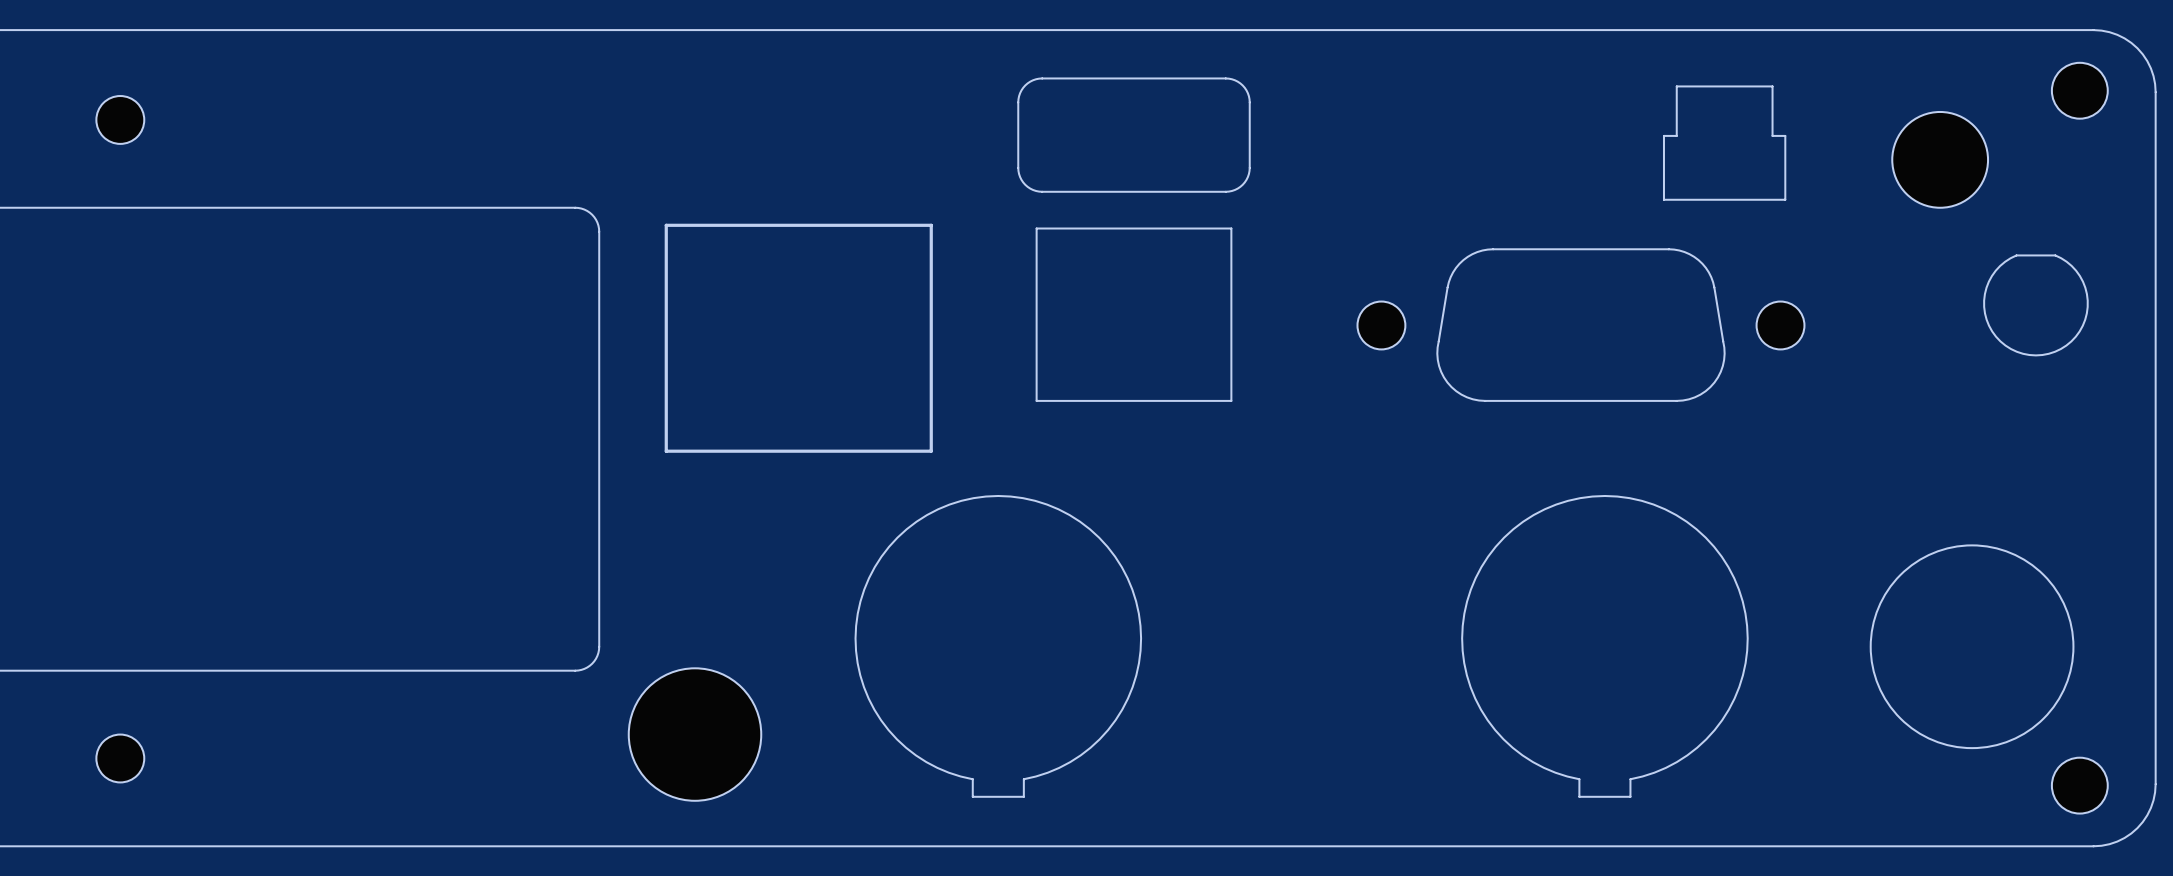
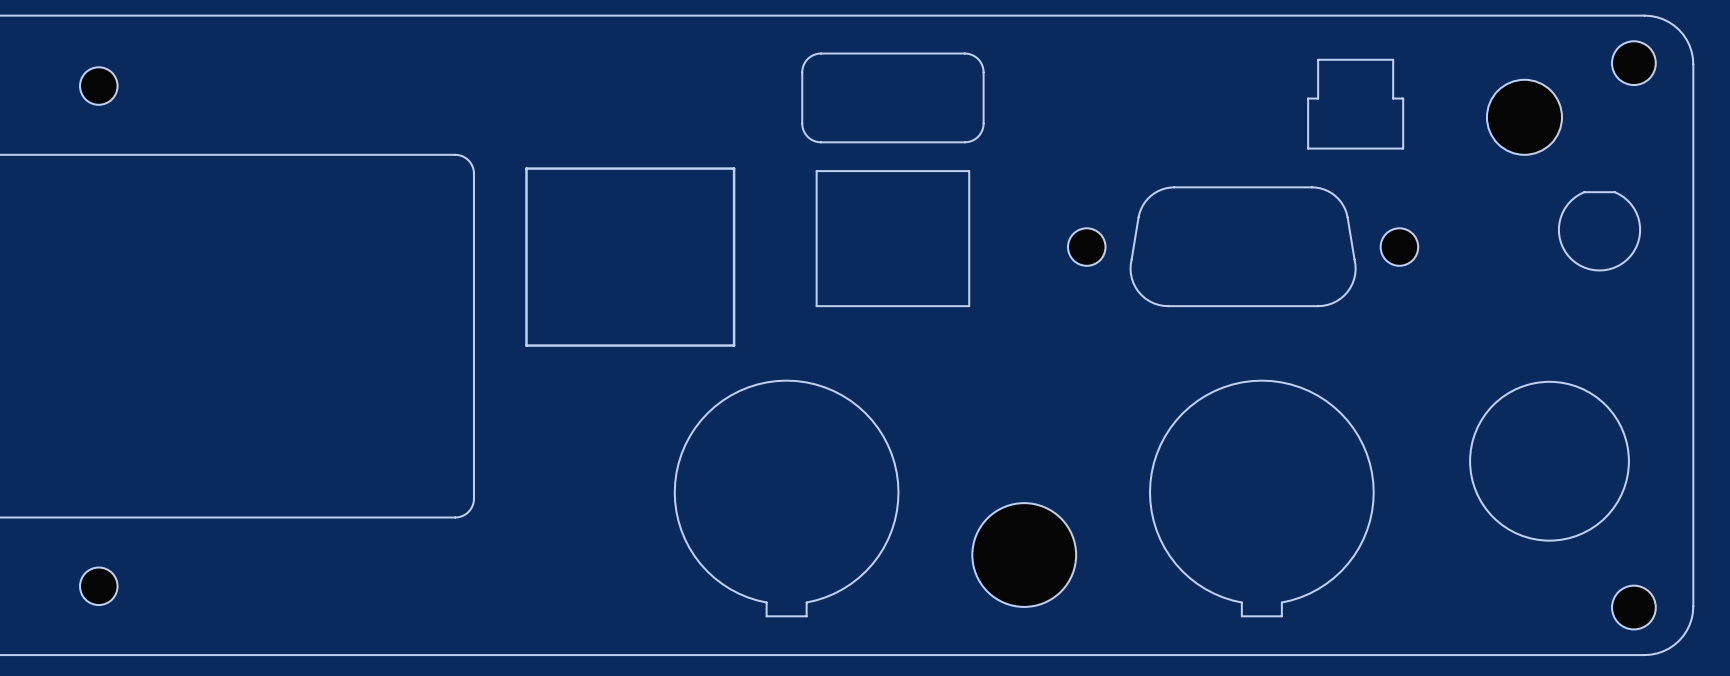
drawing position: (1972, 646) -> (1549, 461)
part: none -> (1024, 555)
part: (695, 734) -> none

